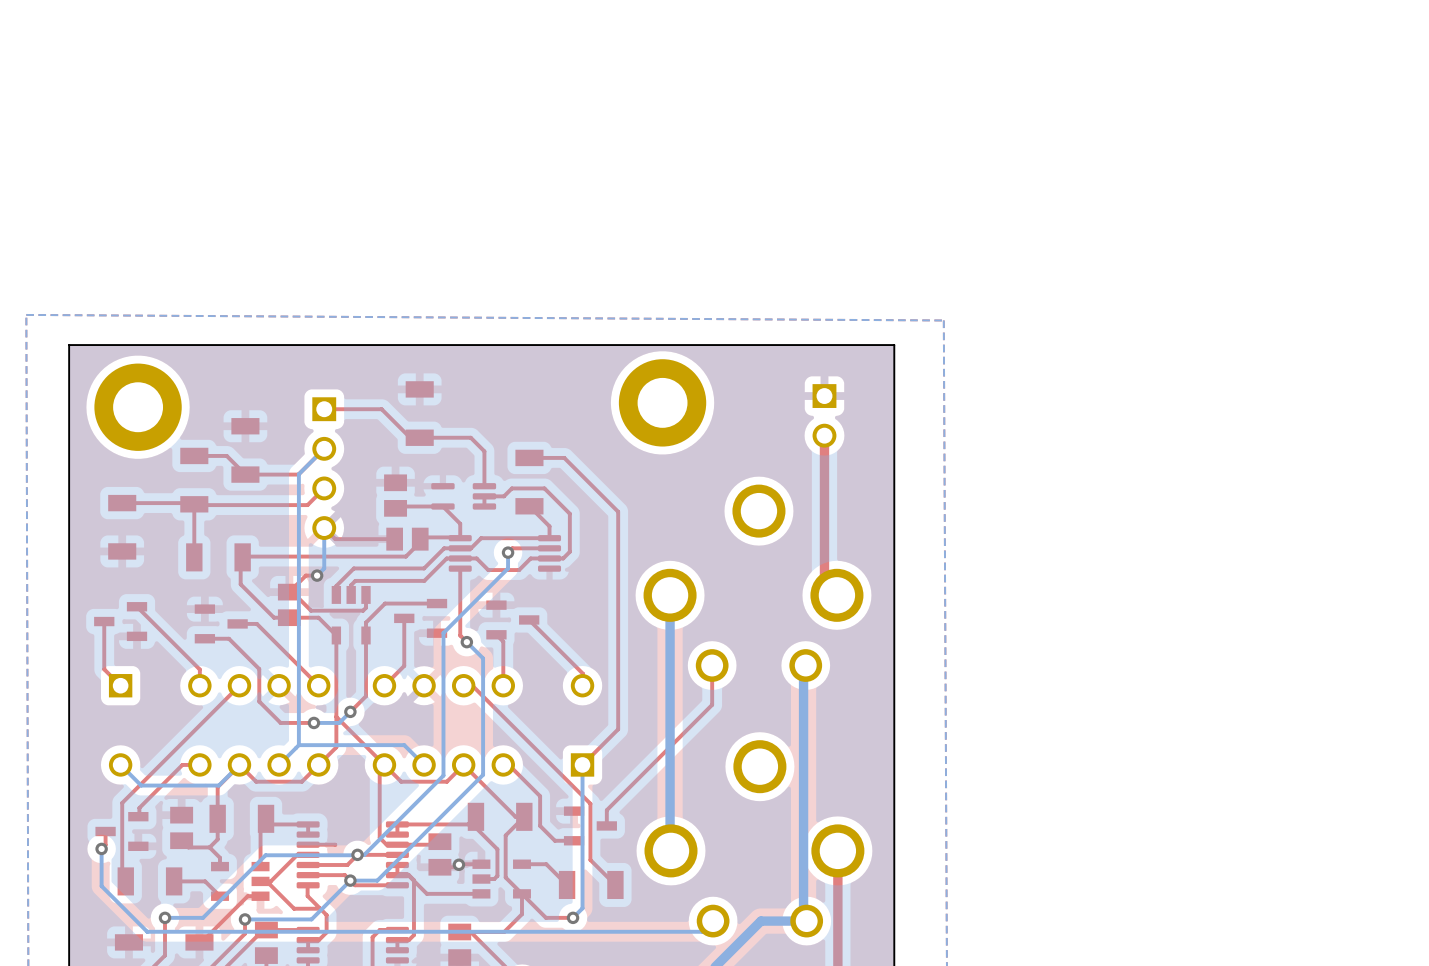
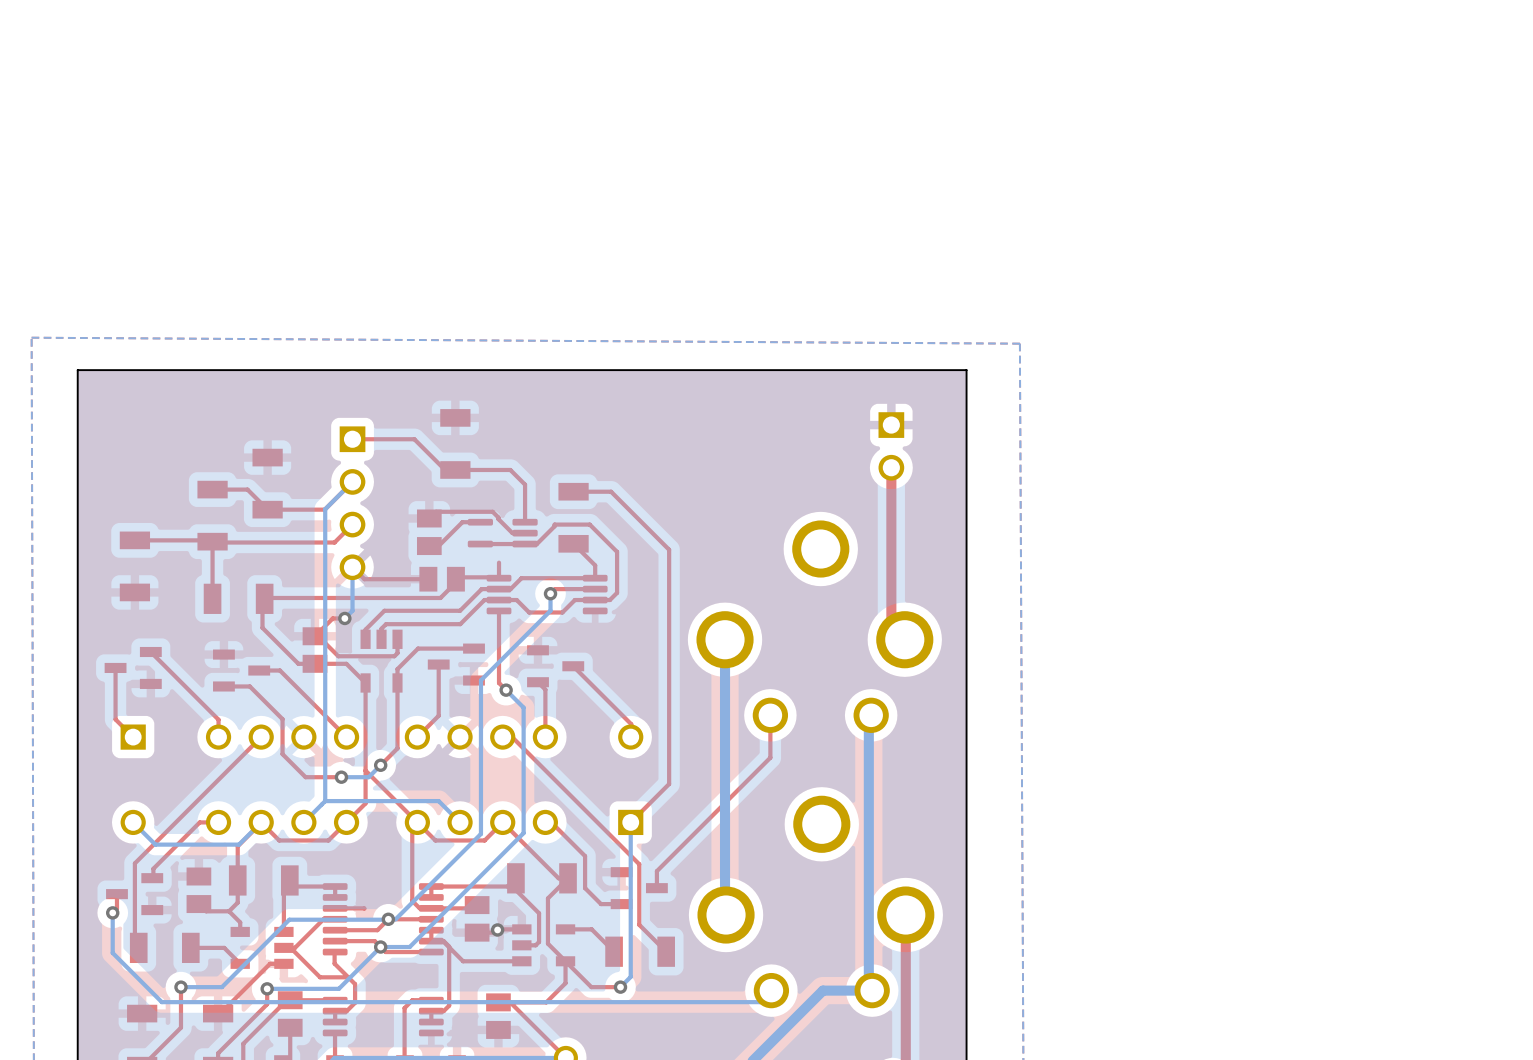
part: (662, 402) -> none
part: (138, 407) -> none
top track: none -> (429, 518) (436, 511) (492, 511) (512, 533) (525, 533)
top track: none -> (480, 522) (462, 522) (438, 546) (429, 546)
top track: (511, 488) (503, 496) (484, 496) (484, 506) -> (554, 524) (536, 544) (480, 544)
top track: (397, 506) (442, 506) (460, 523) -> none

